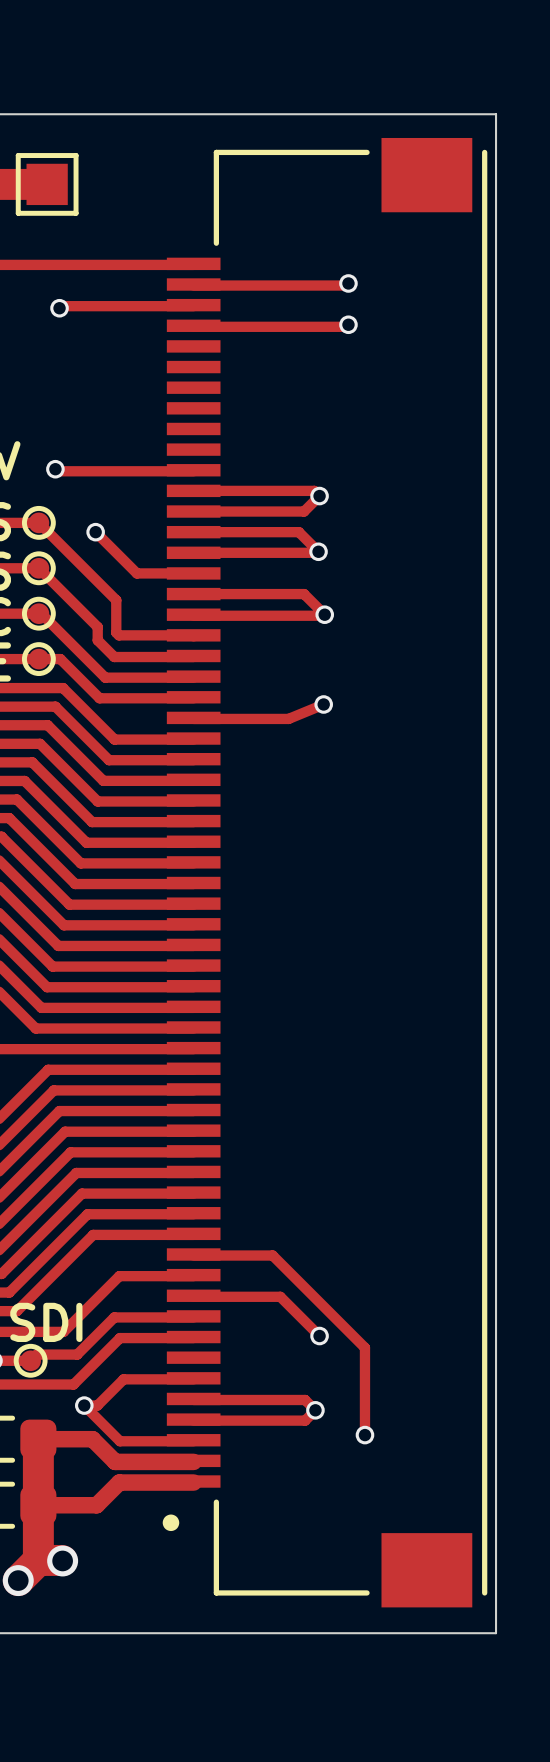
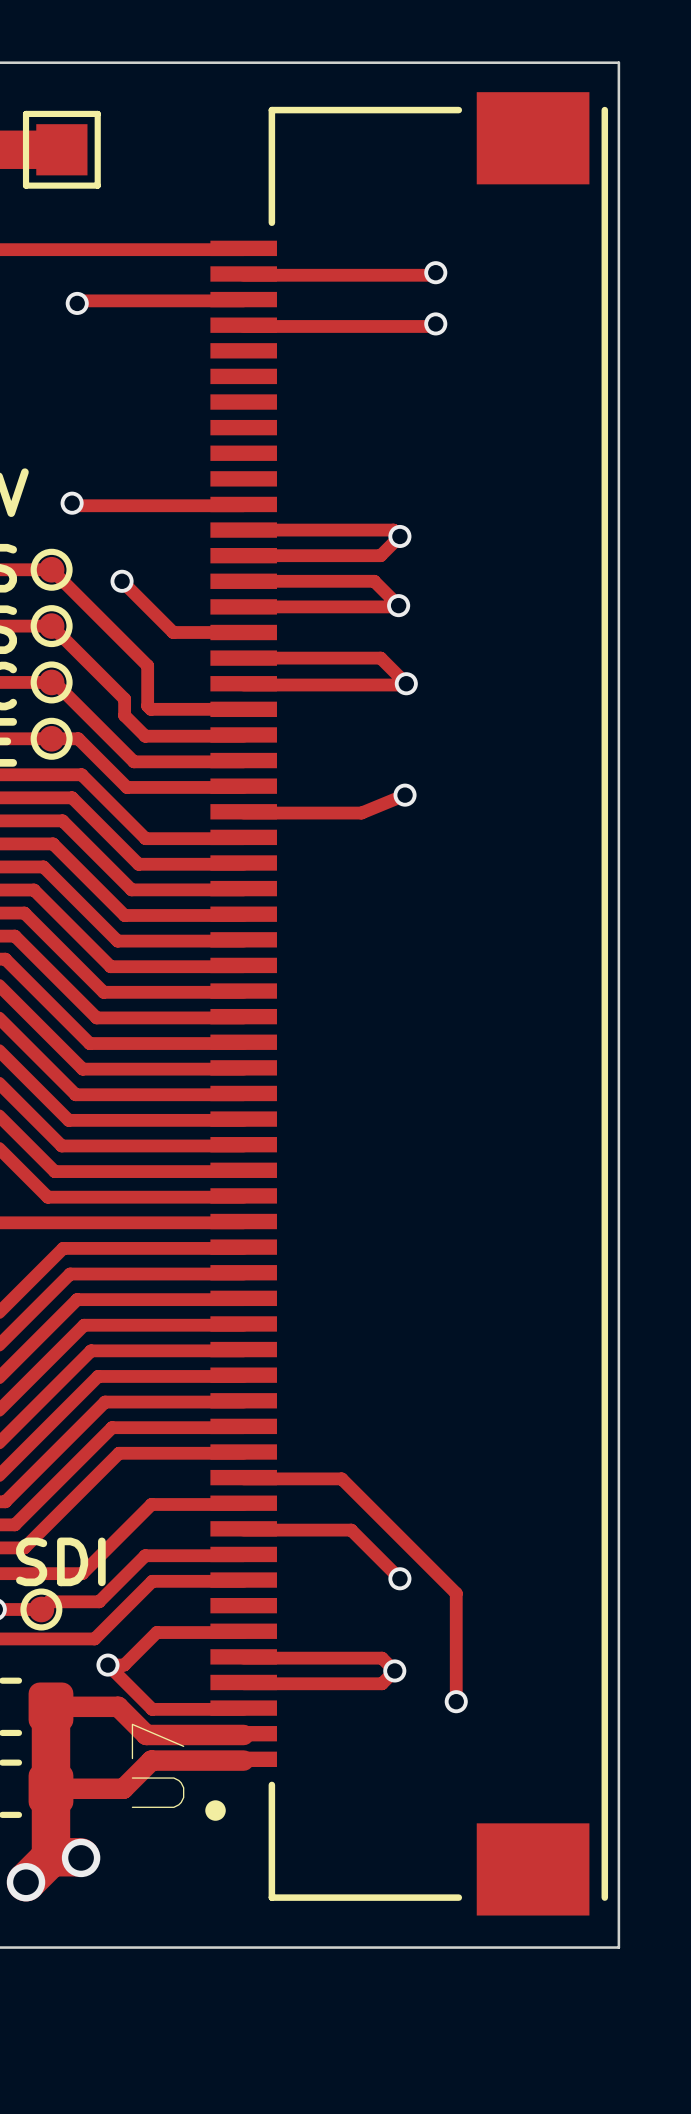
U7 name: none -> U7 (158, 1765)

